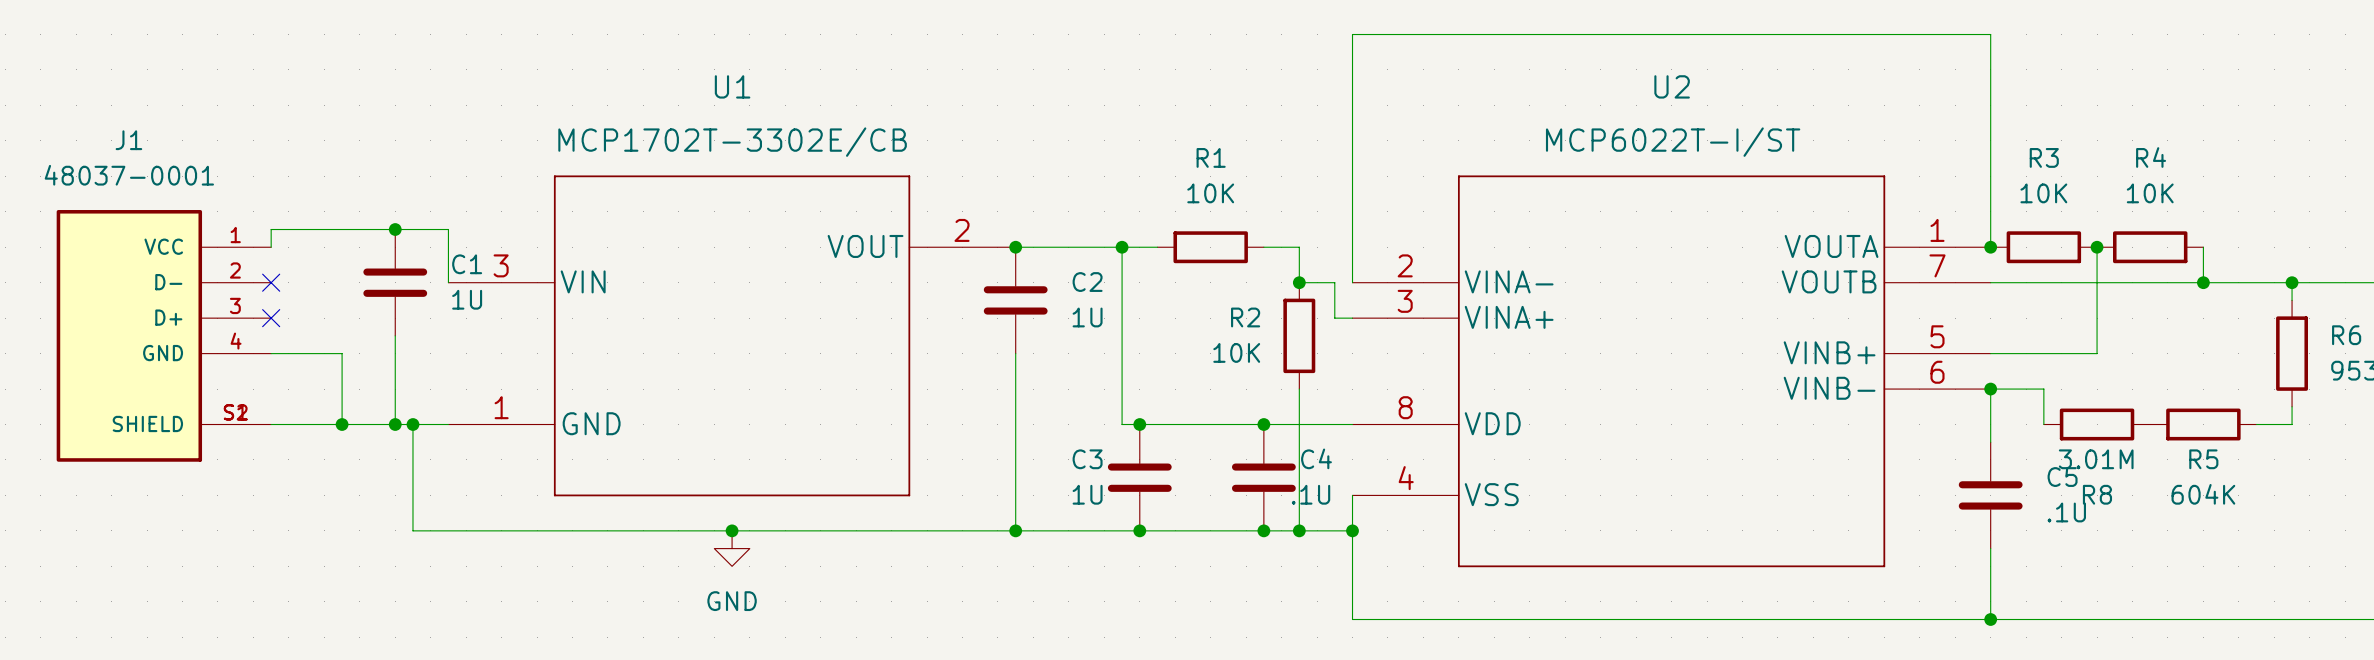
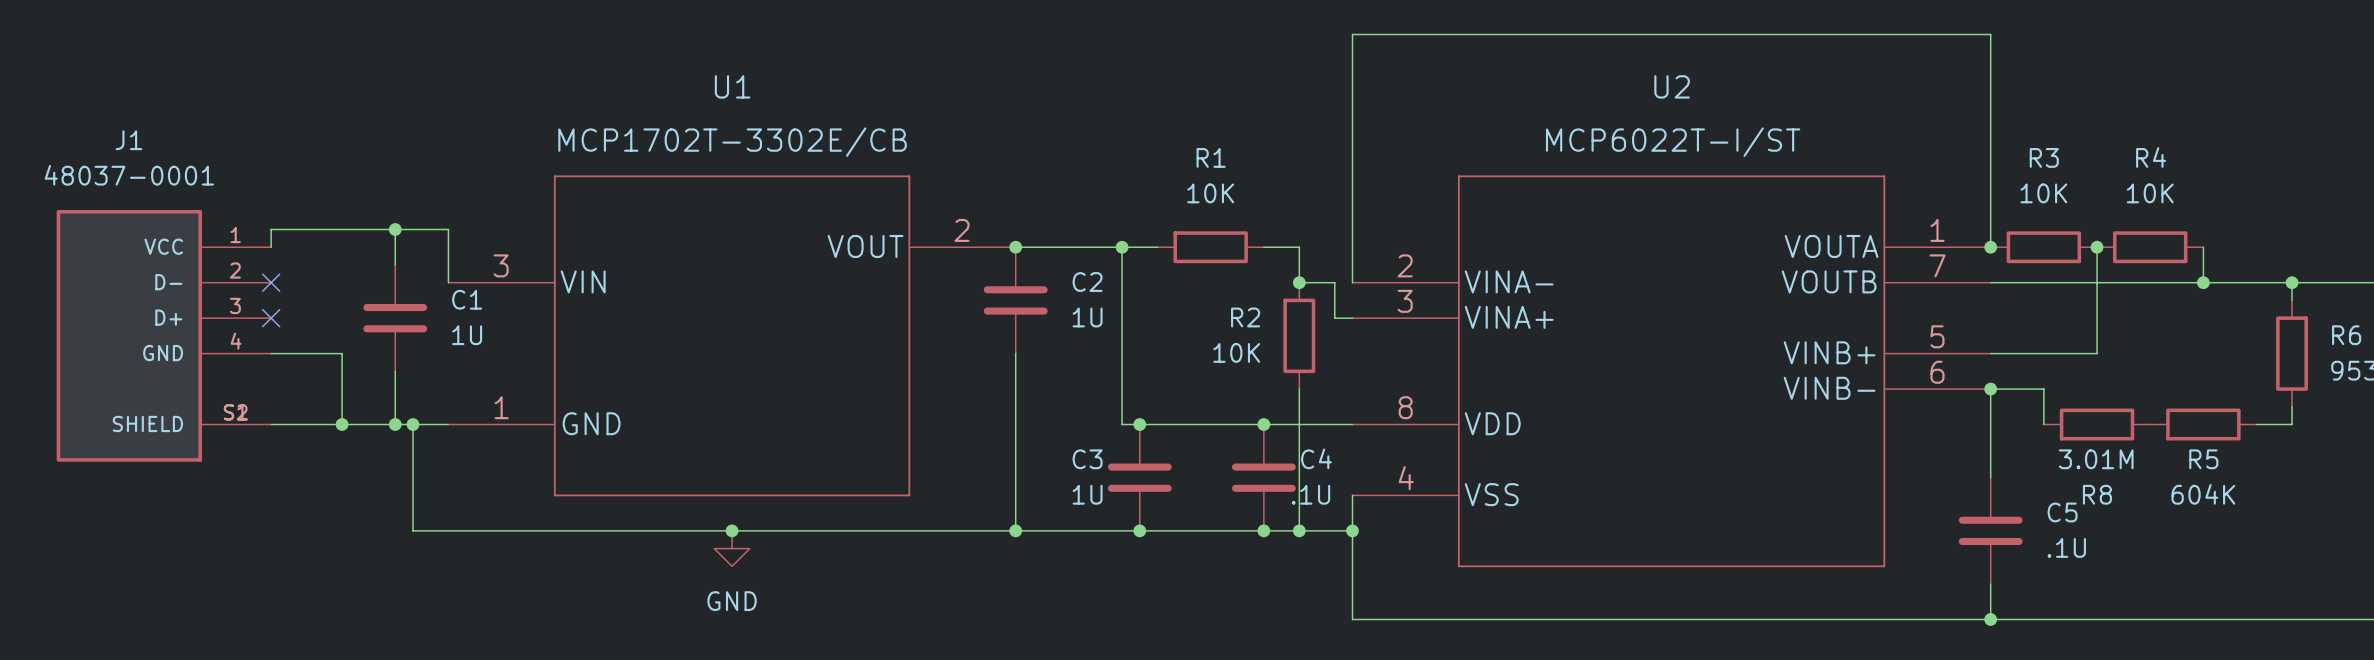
C1 position: (395, 282) -> (395, 318)
C5 position: (1990, 495) -> (1990, 530)

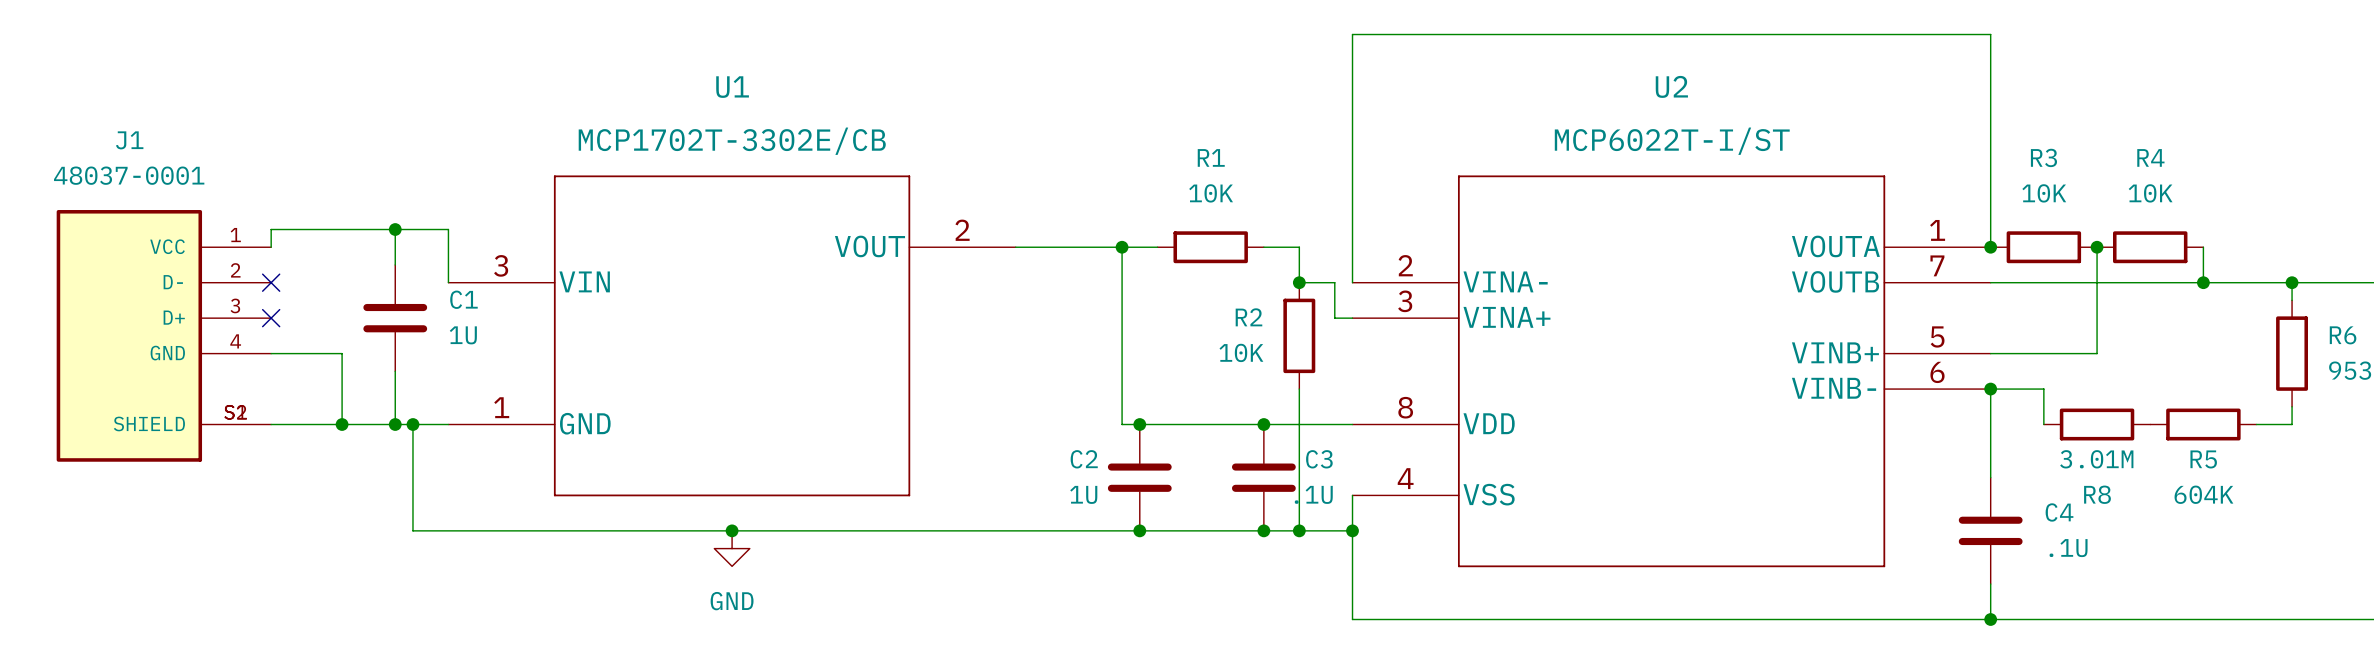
junction: (1015, 247) -> none
C2: 1U (1015, 300) -> none
wire: (1015, 353) (1015, 530) -> none
C4 name: C4 (1316, 458) -> C3 (1319, 459)
C3 name: C3 (1087, 459) -> C2 (1084, 459)
C5 name: C5 (2062, 512) -> C4 (2059, 512)
junction: (1015, 530) -> none

